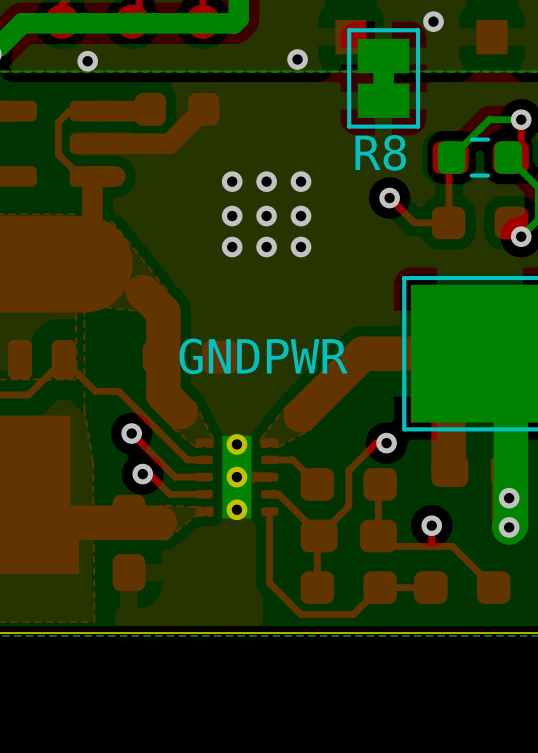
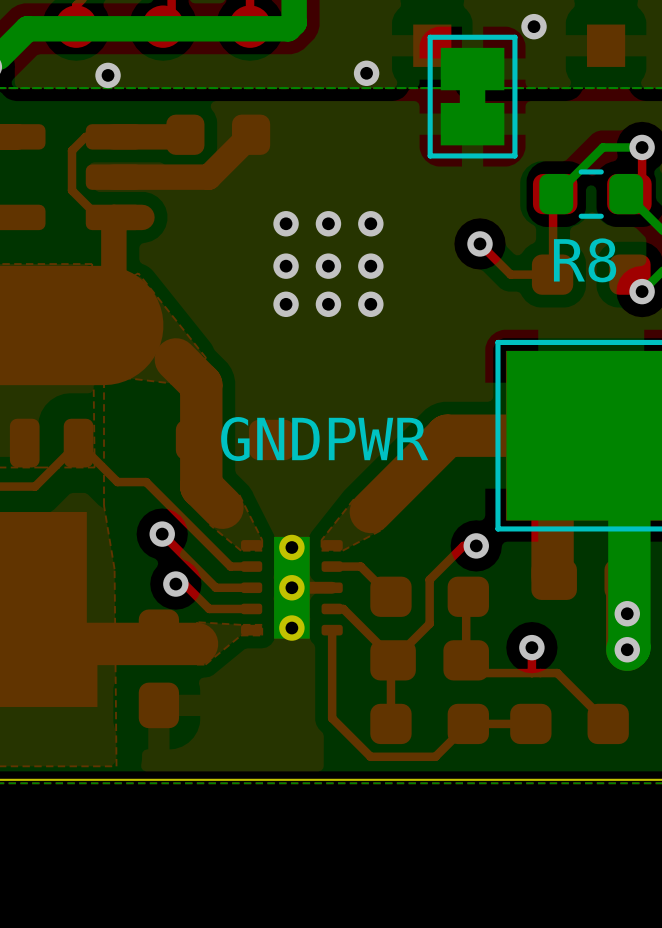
R8 name position: R8 (380, 152) -> R8 (585, 260)

